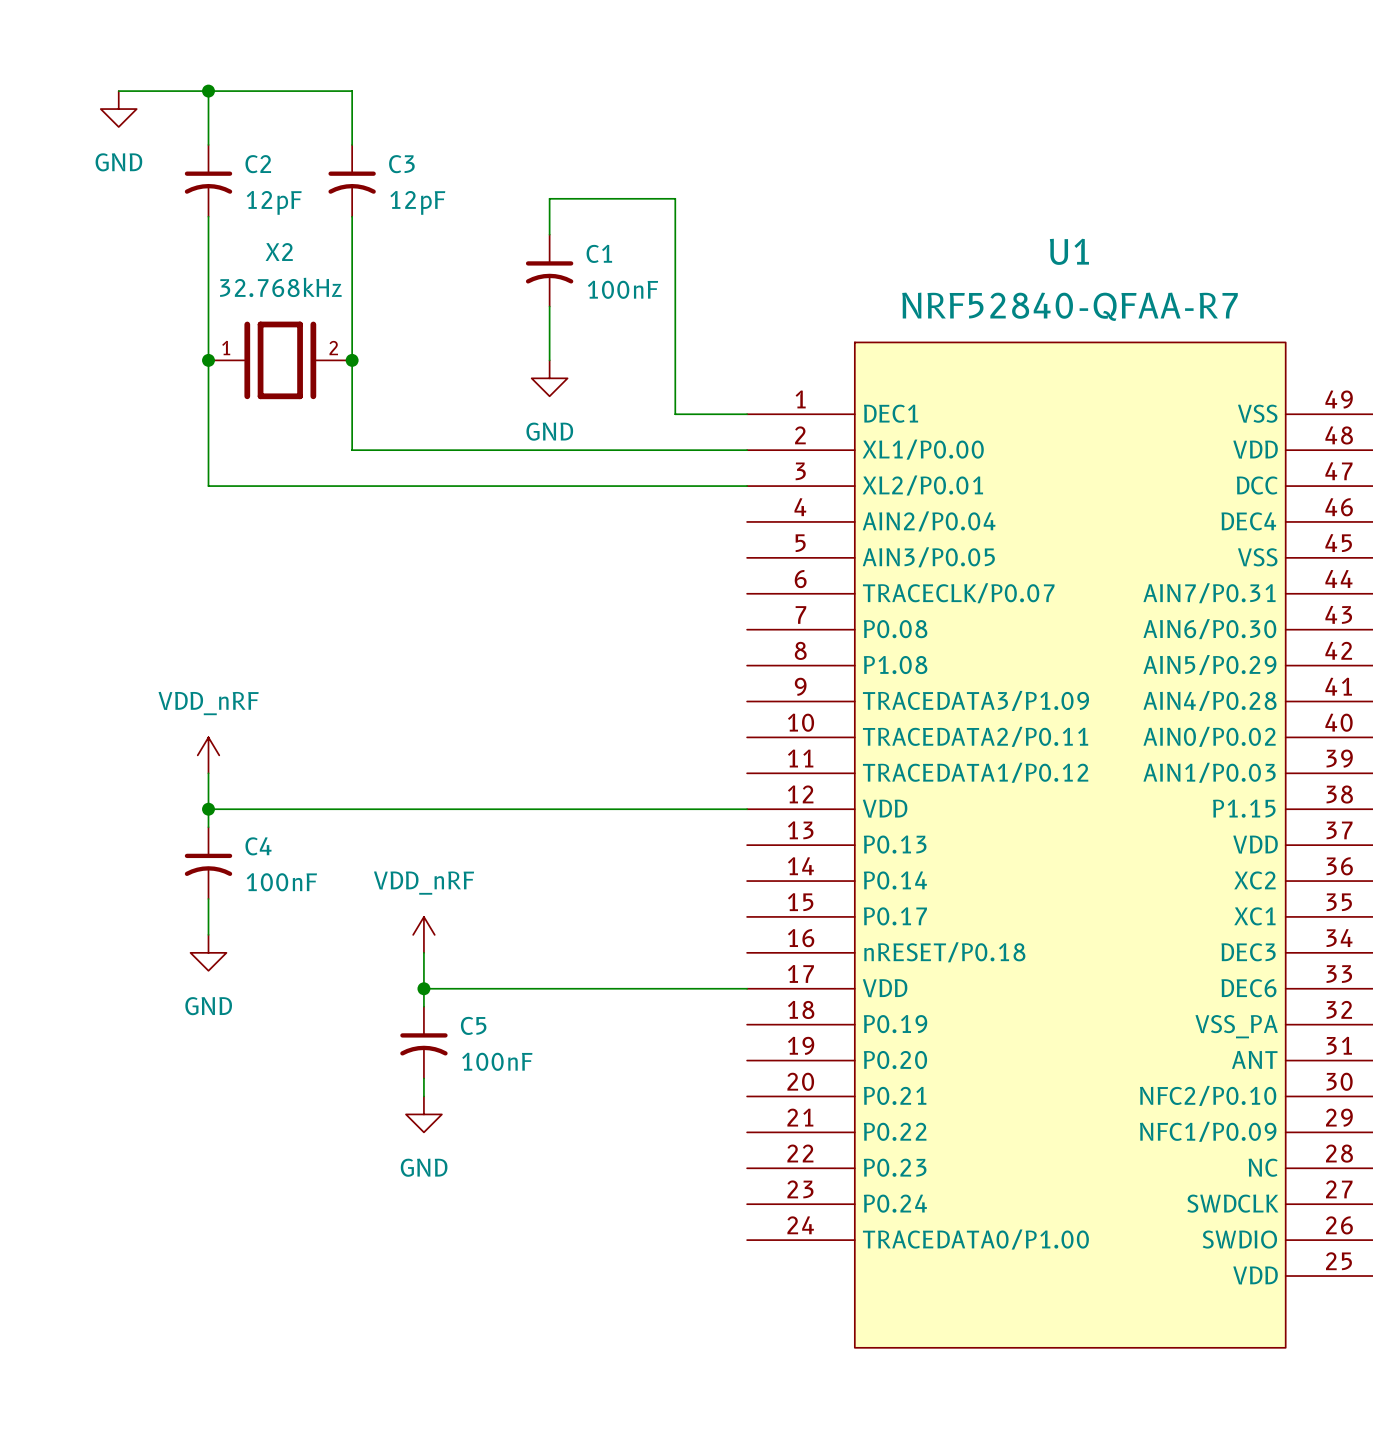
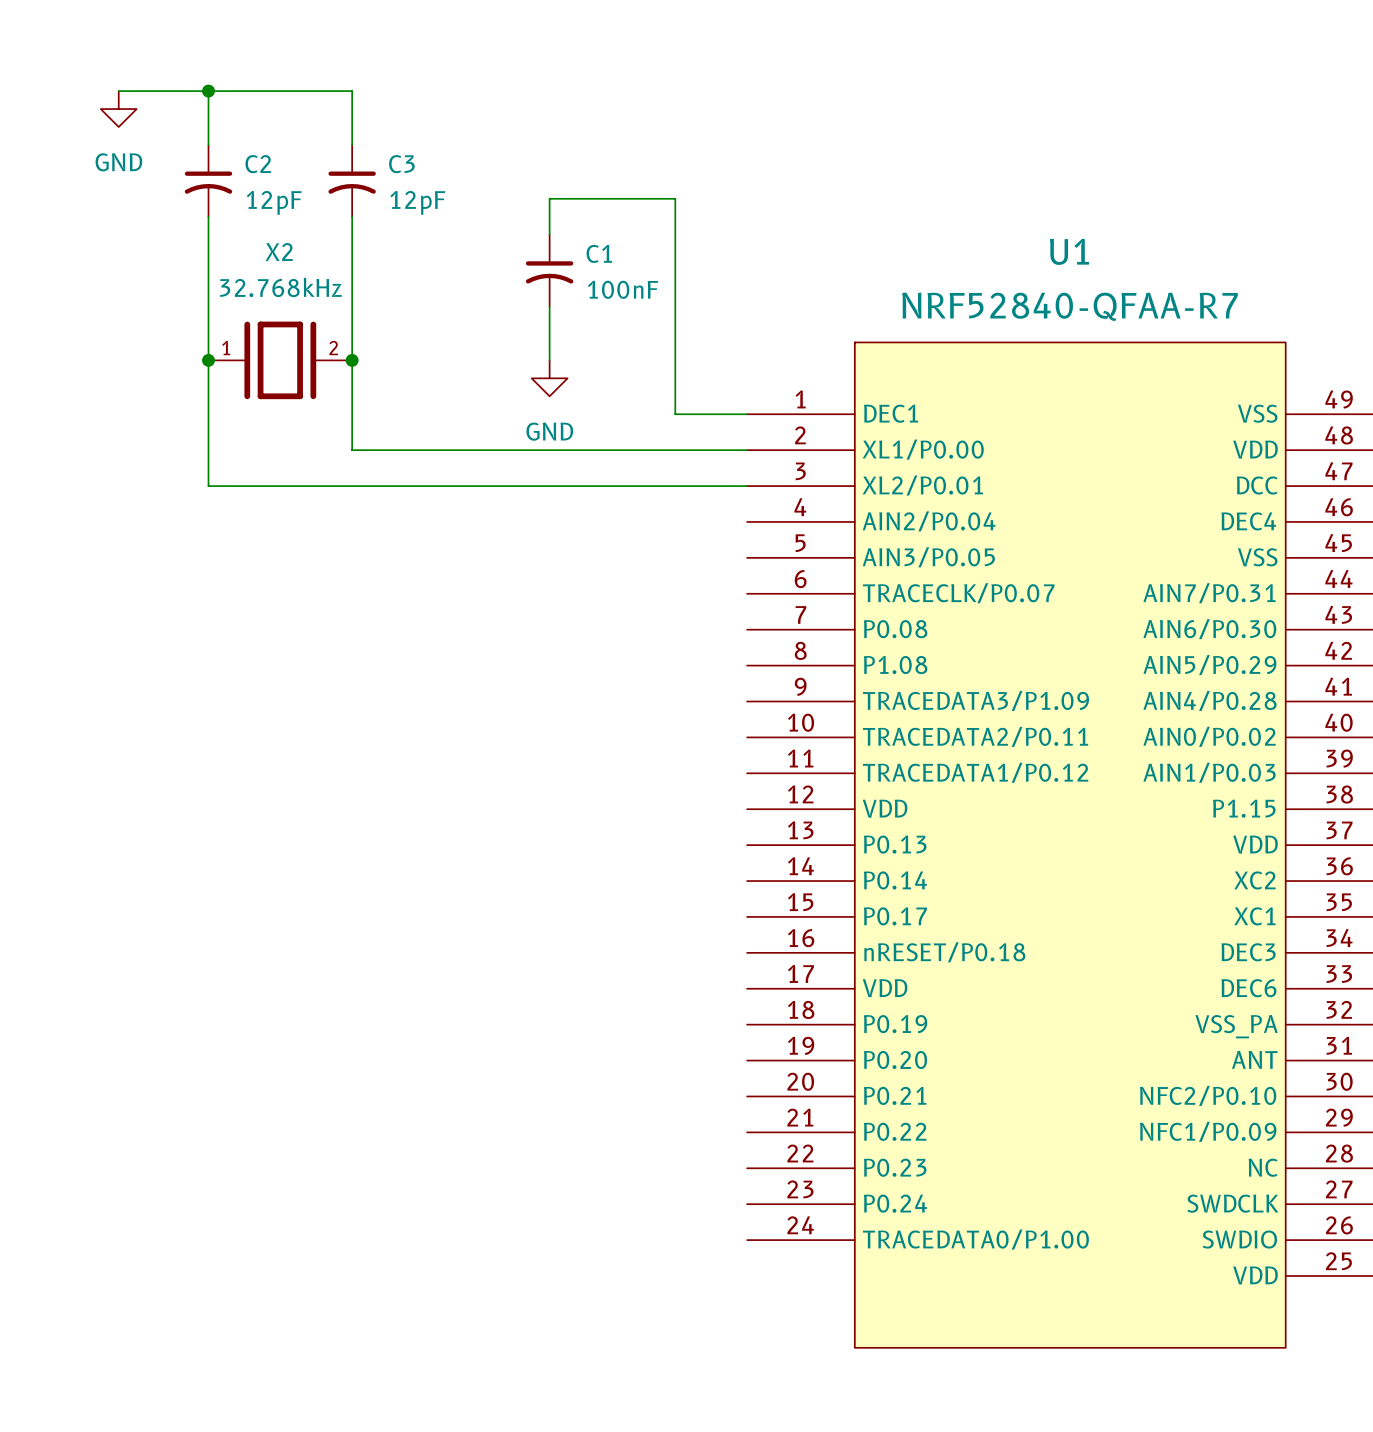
power symbol: VDD_nRF (208, 755) -> none
wire: (208, 773) (208, 827) -> none
wire: (208, 809) (747, 809) -> none
junction: (208, 809) -> none
C4: 100nF (208, 863) -> none
wire: (208, 898) (208, 934) -> none
power symbol: VDD_nRF (423, 934) -> none
power symbol: GND (208, 952) -> none
wire: (423, 952) (423, 1006) -> none
wire: (423, 988) (747, 988) -> none
junction: (423, 988) -> none
C5: 100nF (423, 1042) -> none
wire: (423, 1078) (423, 1096) -> none
power symbol: GND (423, 1114) -> none

